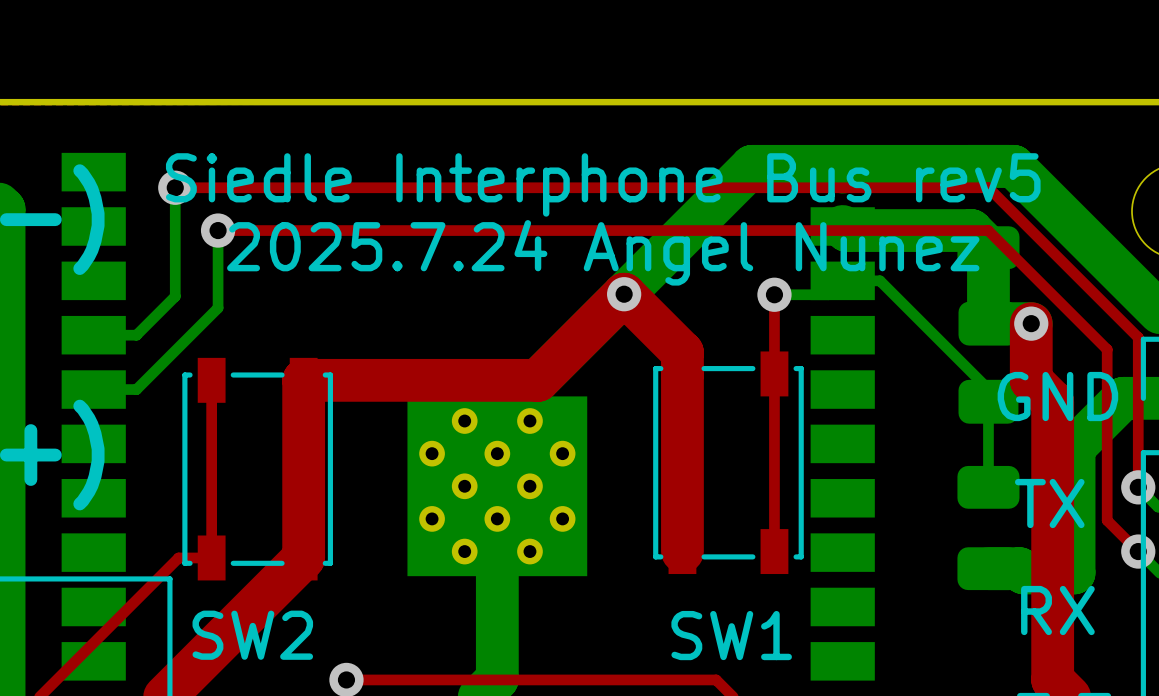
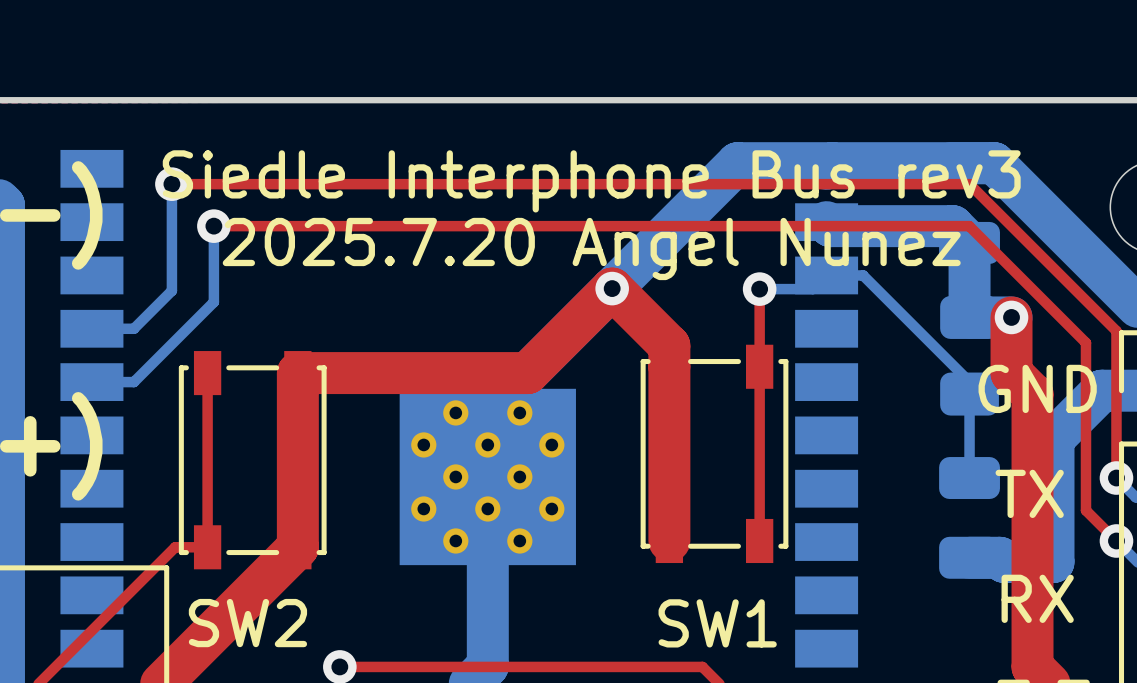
text: Siedle Interphone Bus rev5 (603, 184) -> Siedle Interphone Bus rev3 (591, 181)
text: 2025.7.24 Angel Nunez (603, 252) -> 2025.7.20 Angel Nunez (591, 248)

